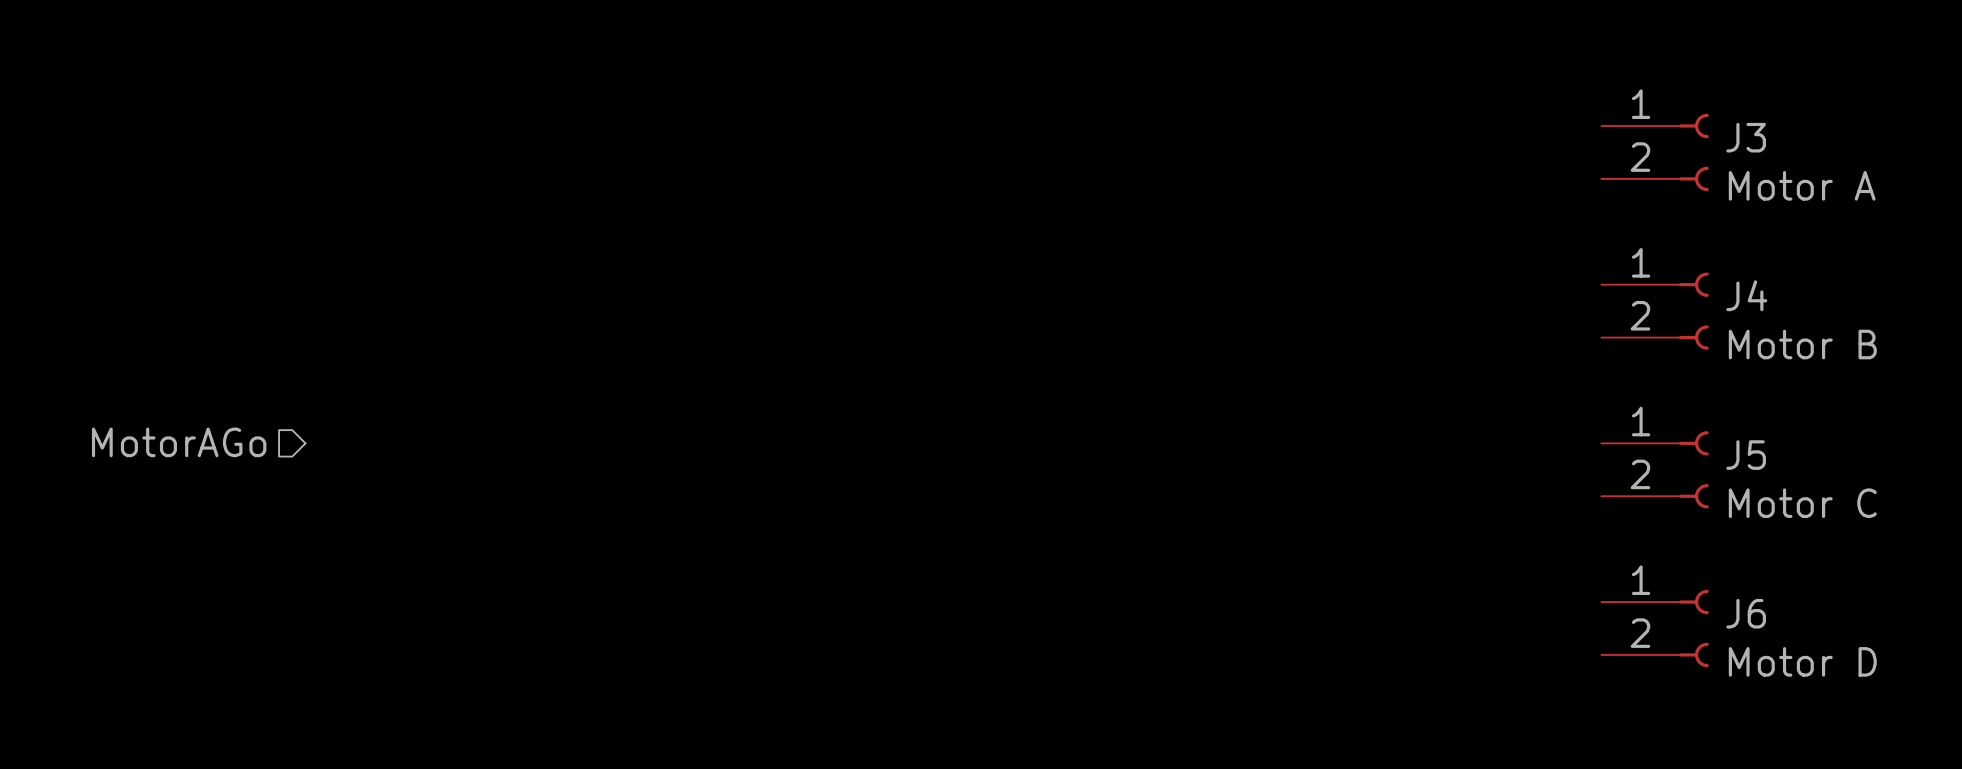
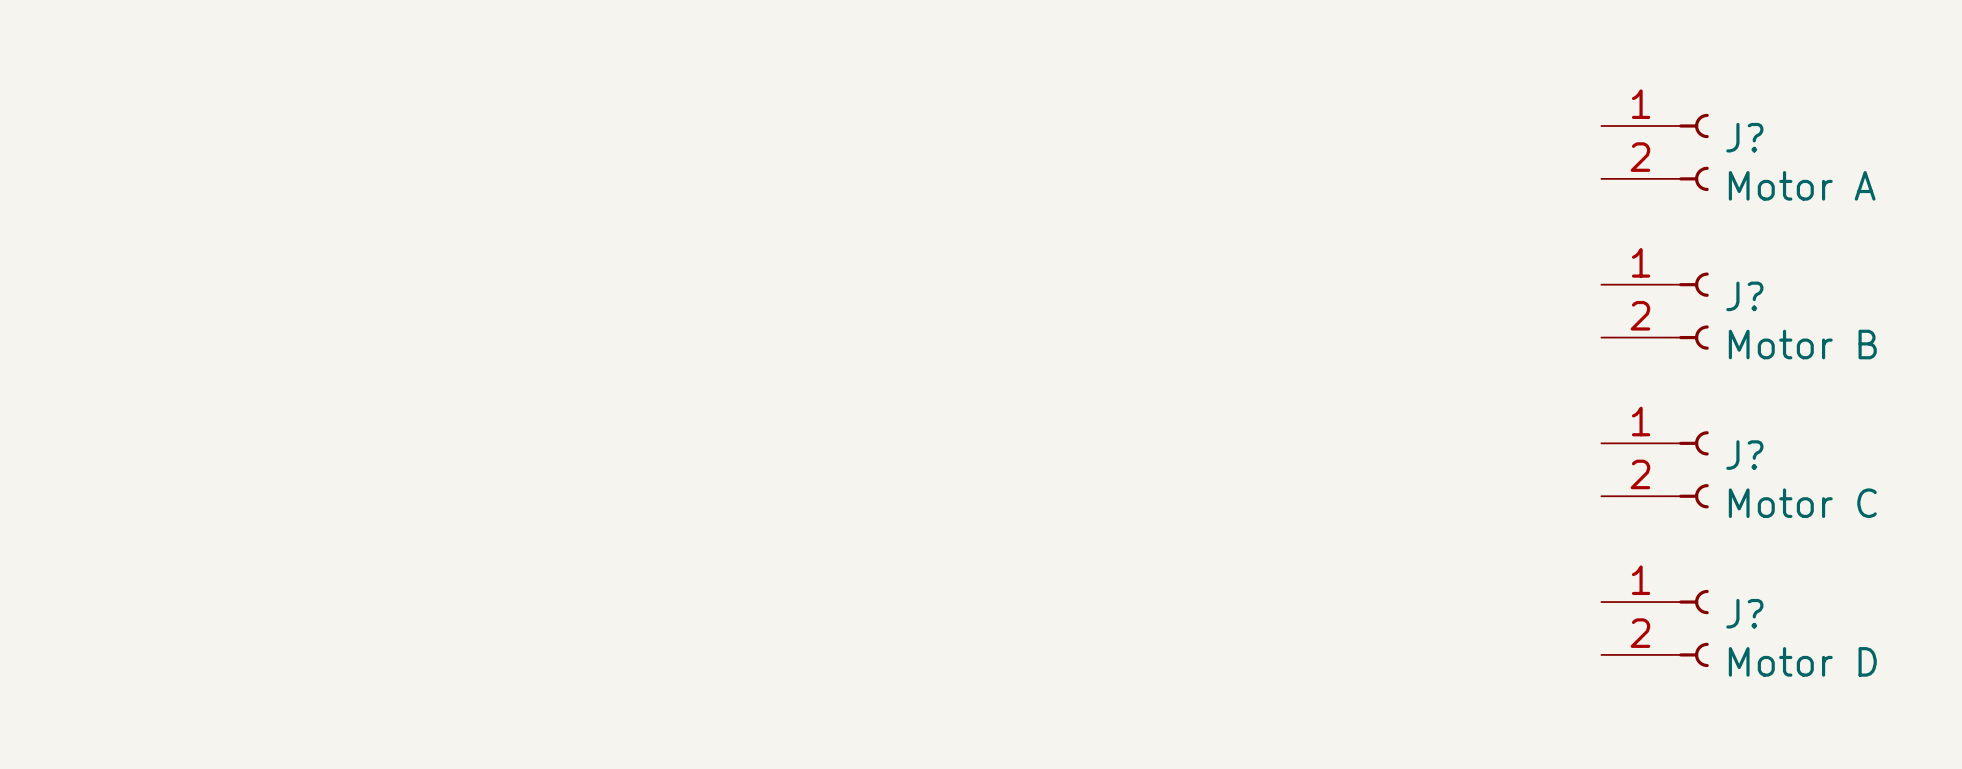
J3 name: J3 (1746, 137) -> J? (1744, 137)
J4 name: J4 (1746, 295) -> J? (1744, 296)
hierarchical label: MotorAGo (179, 442) -> none
J5 name: J5 (1746, 455) -> J? (1744, 455)
J6 name: J6 (1746, 613) -> J? (1744, 613)

